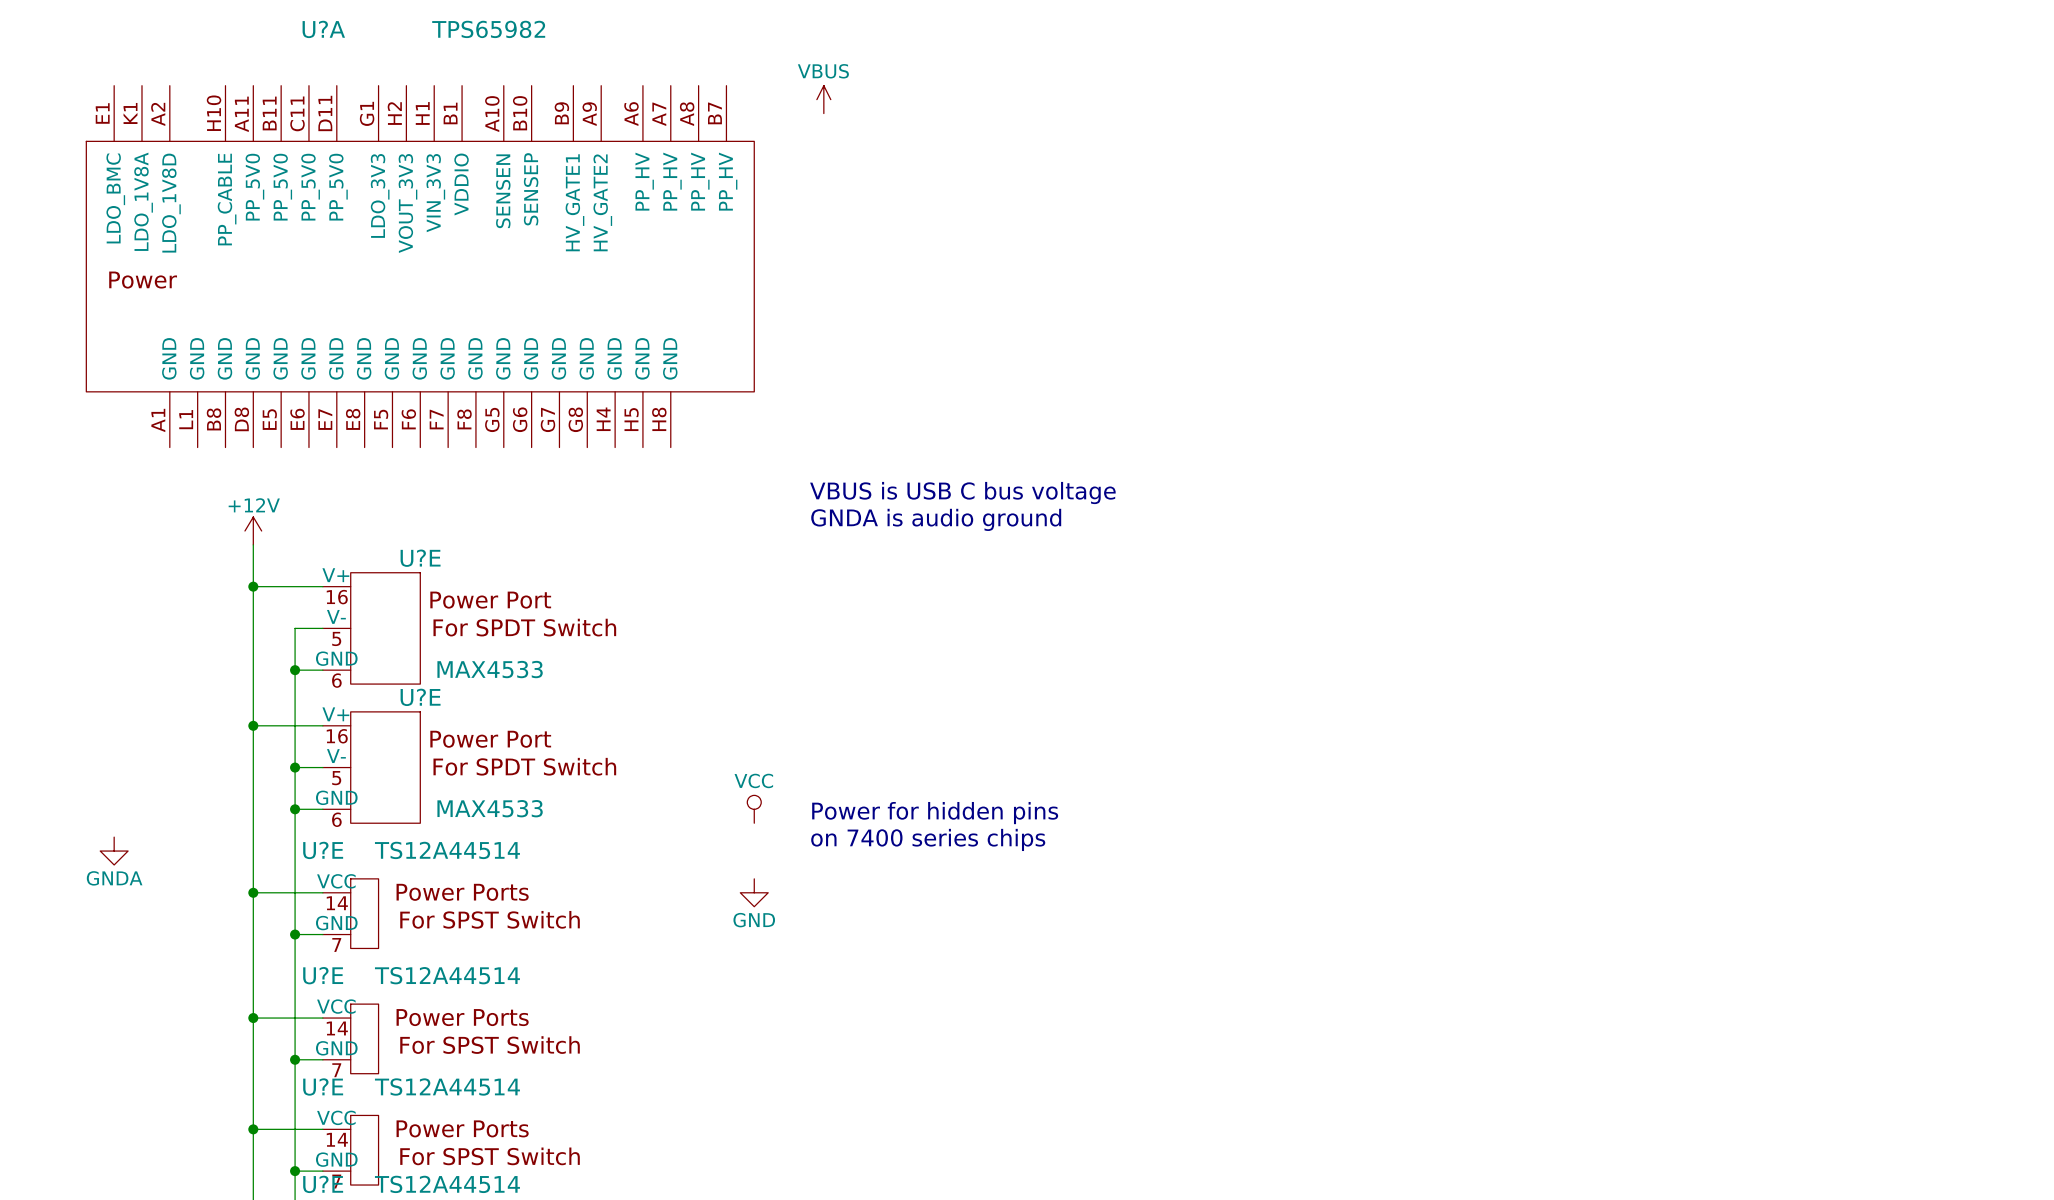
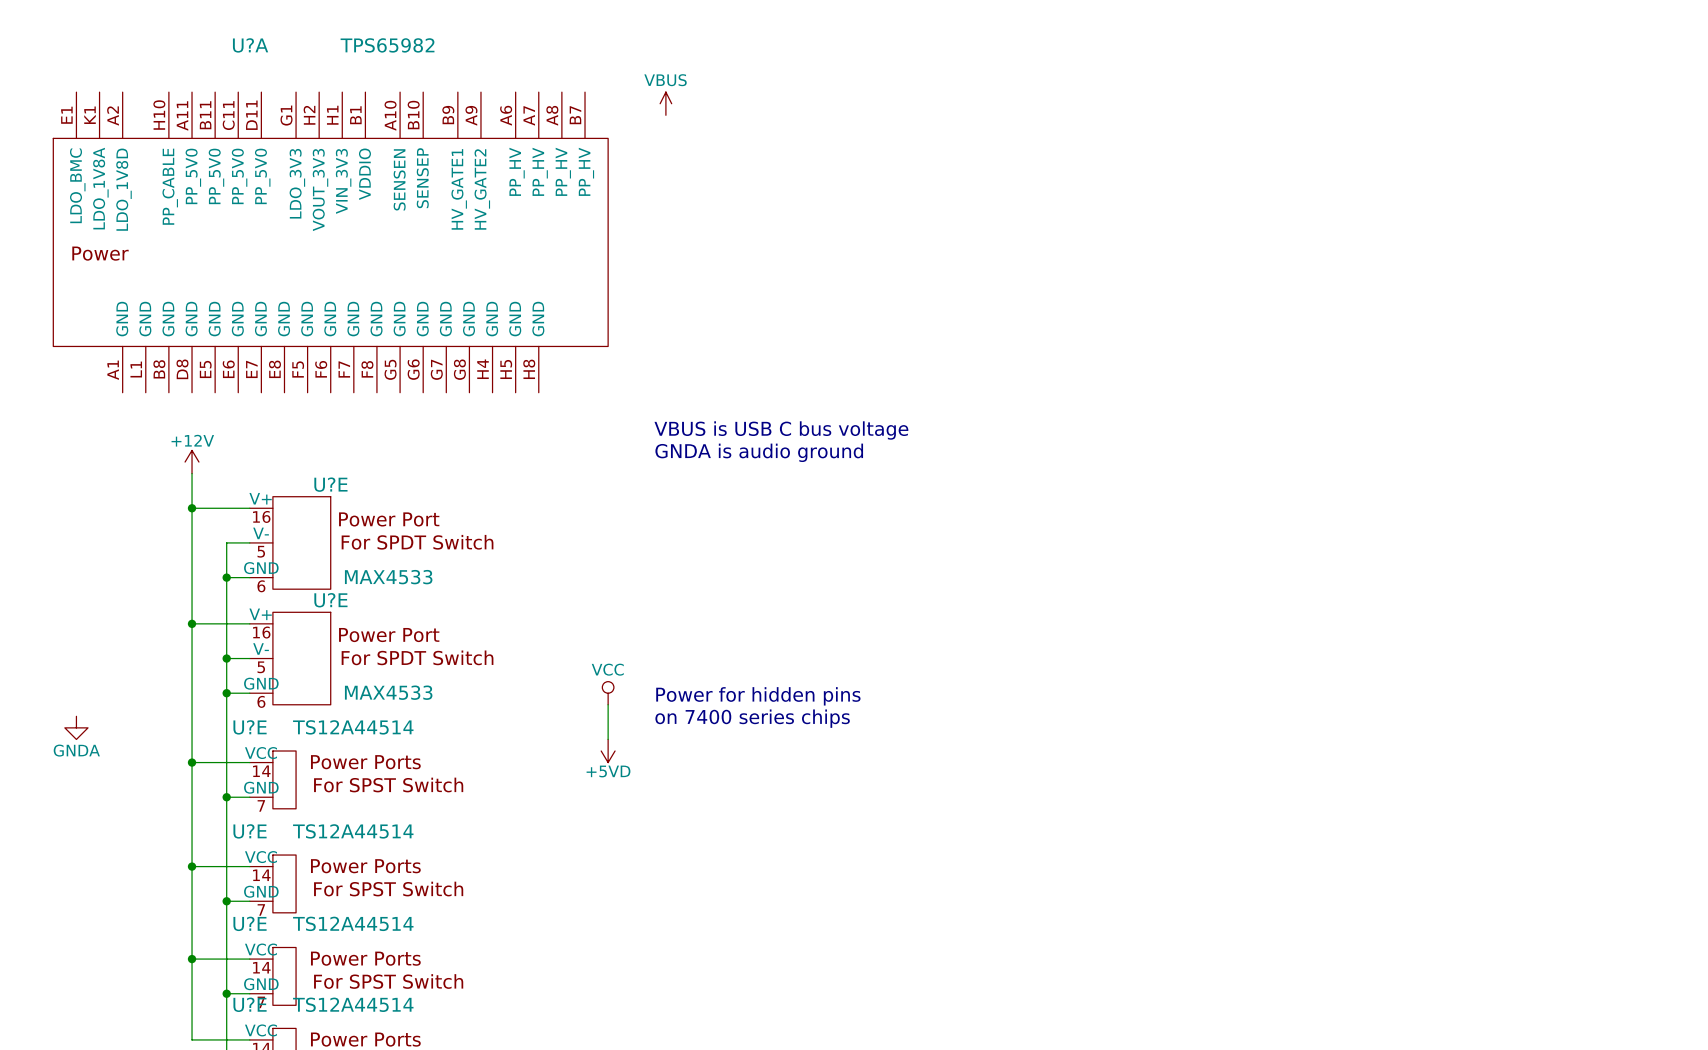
wire: none -> (608, 704) (608, 739)
power symbol: none -> +5VD (608, 751)
power symbol: GND (754, 892) -> none

